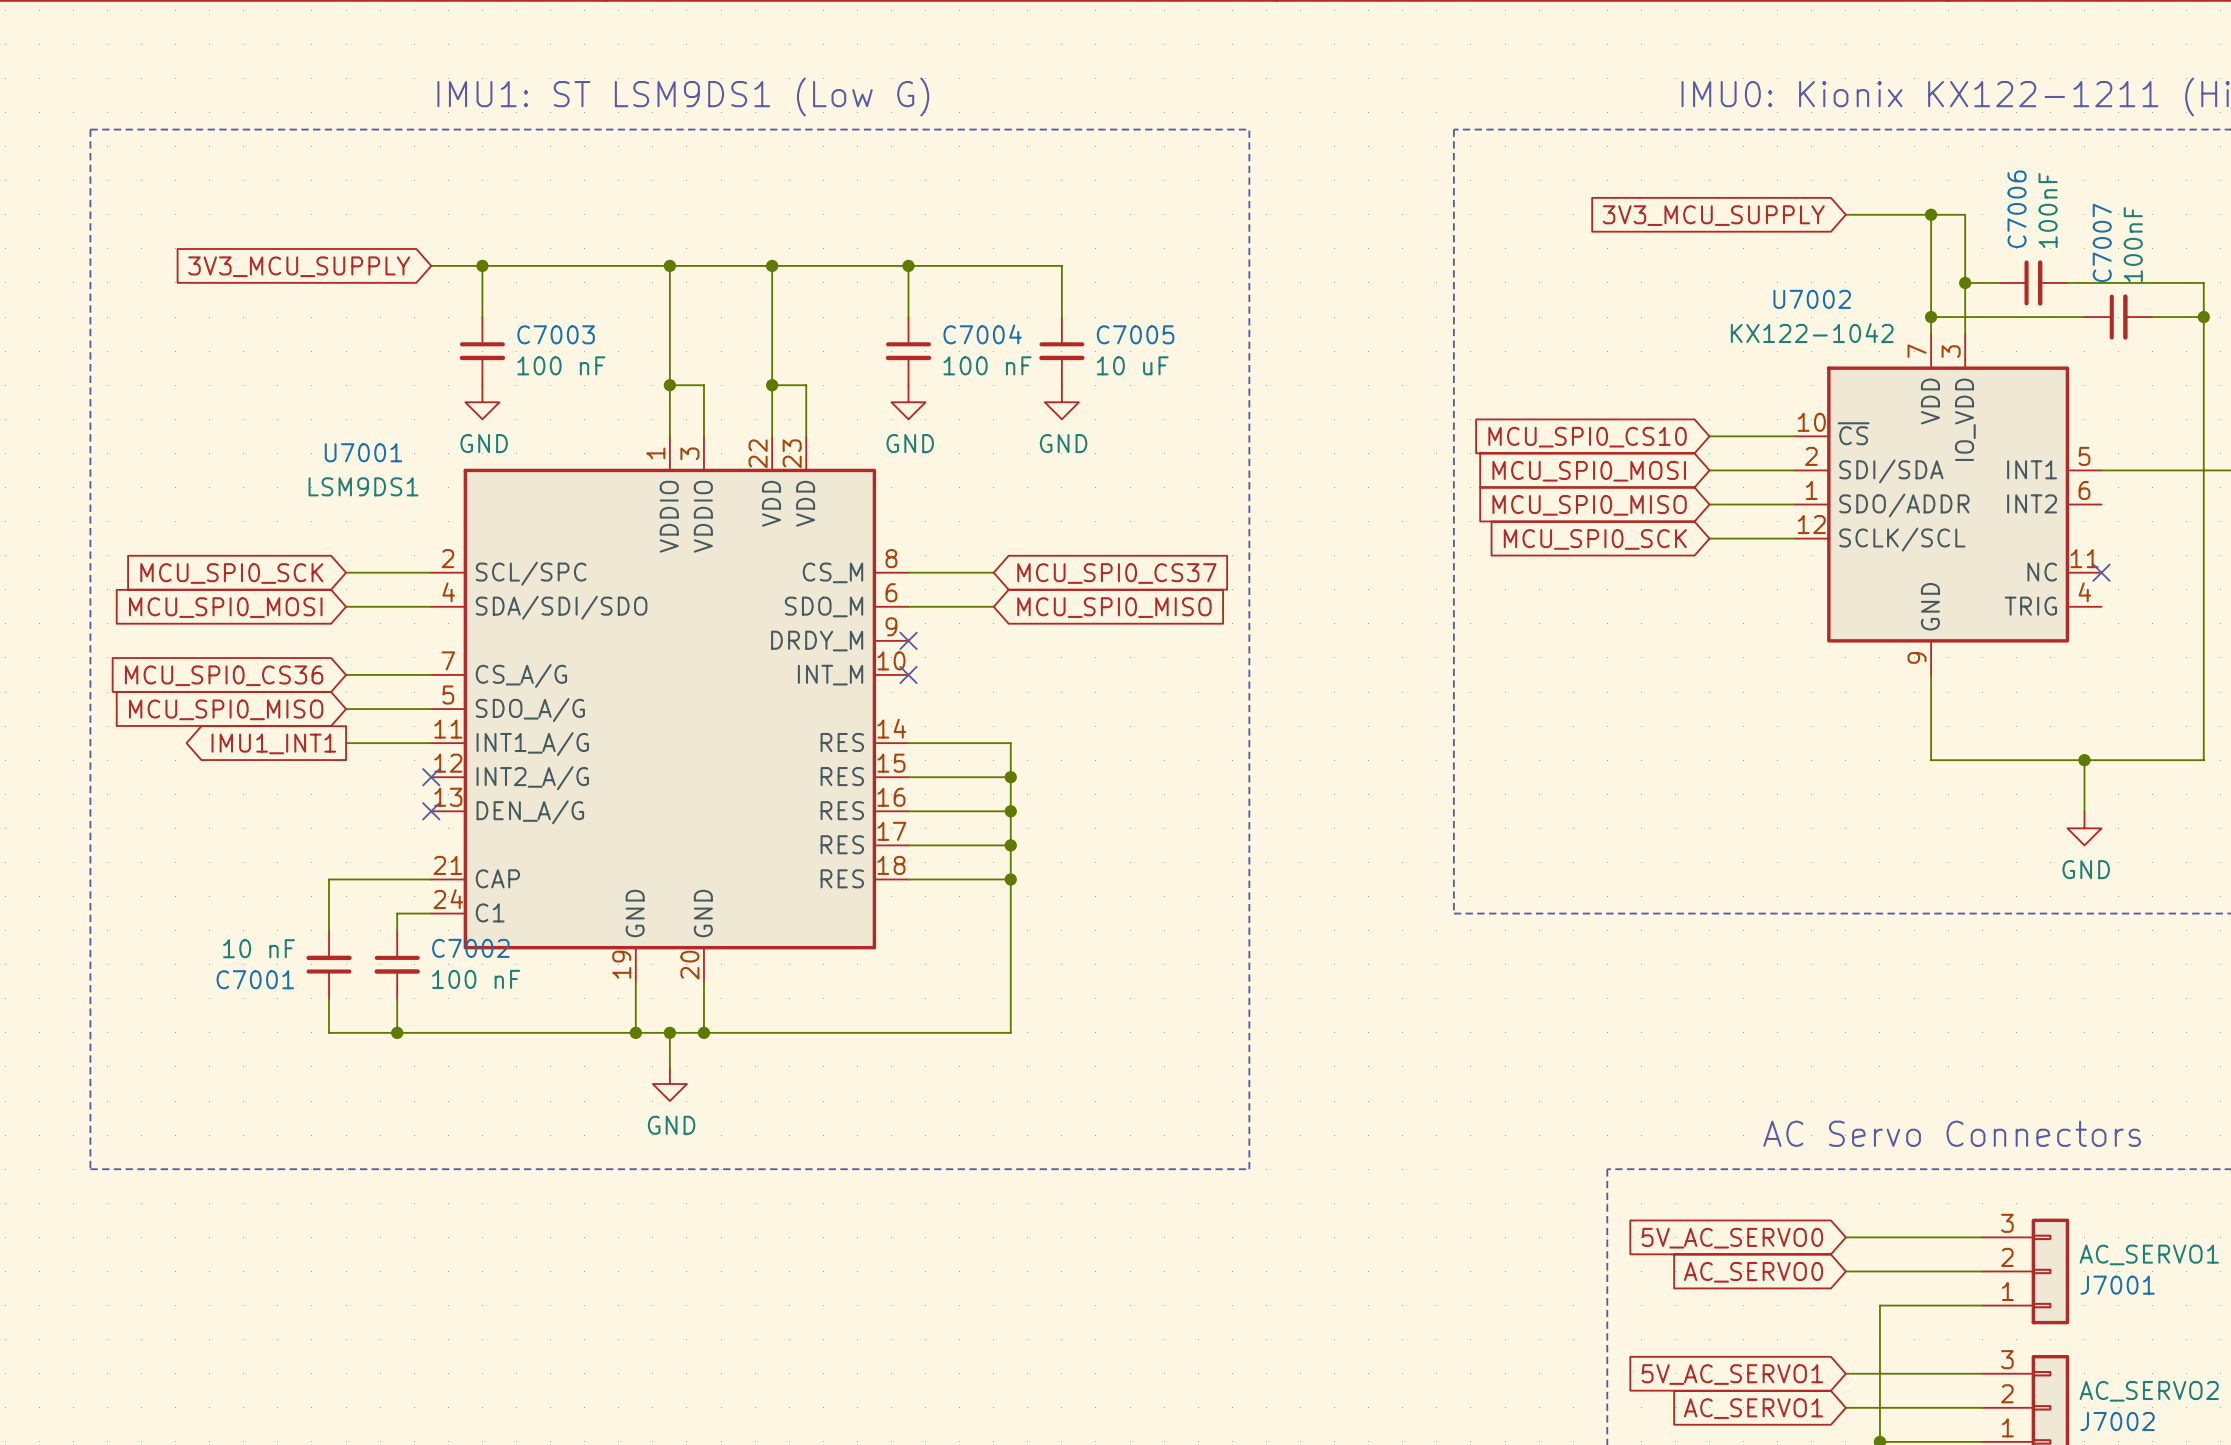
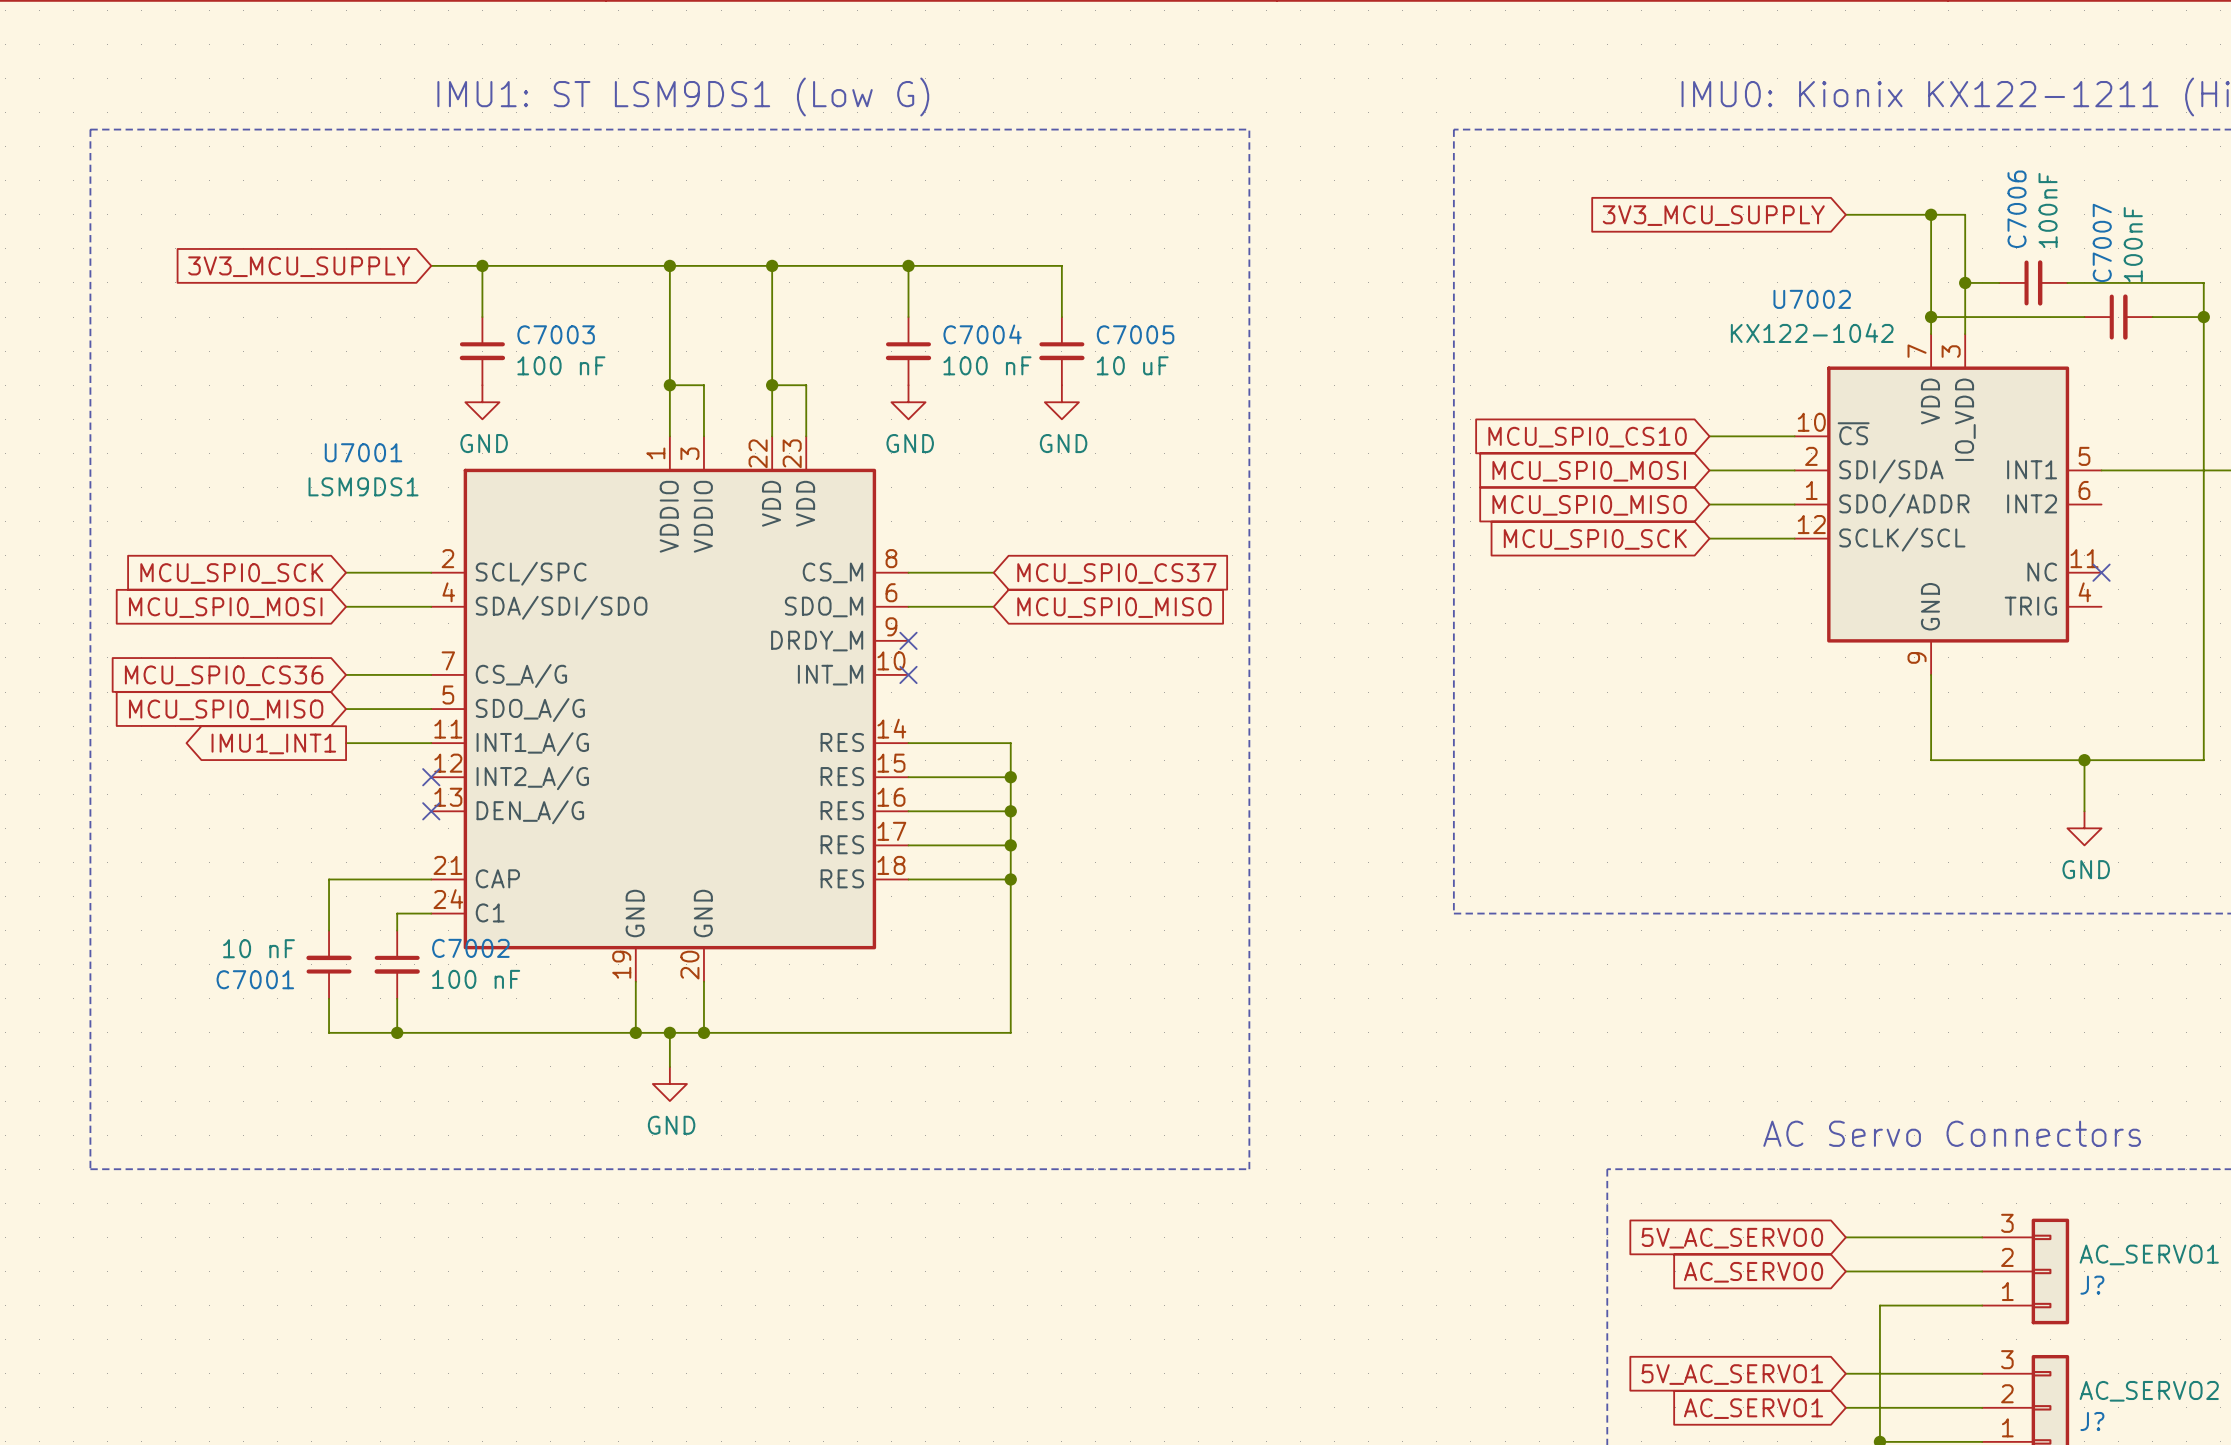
J7001 name: J7001 (2117, 1285) -> J? (2092, 1285)
J7002 name: J7002 (2117, 1421) -> J? (2092, 1421)

